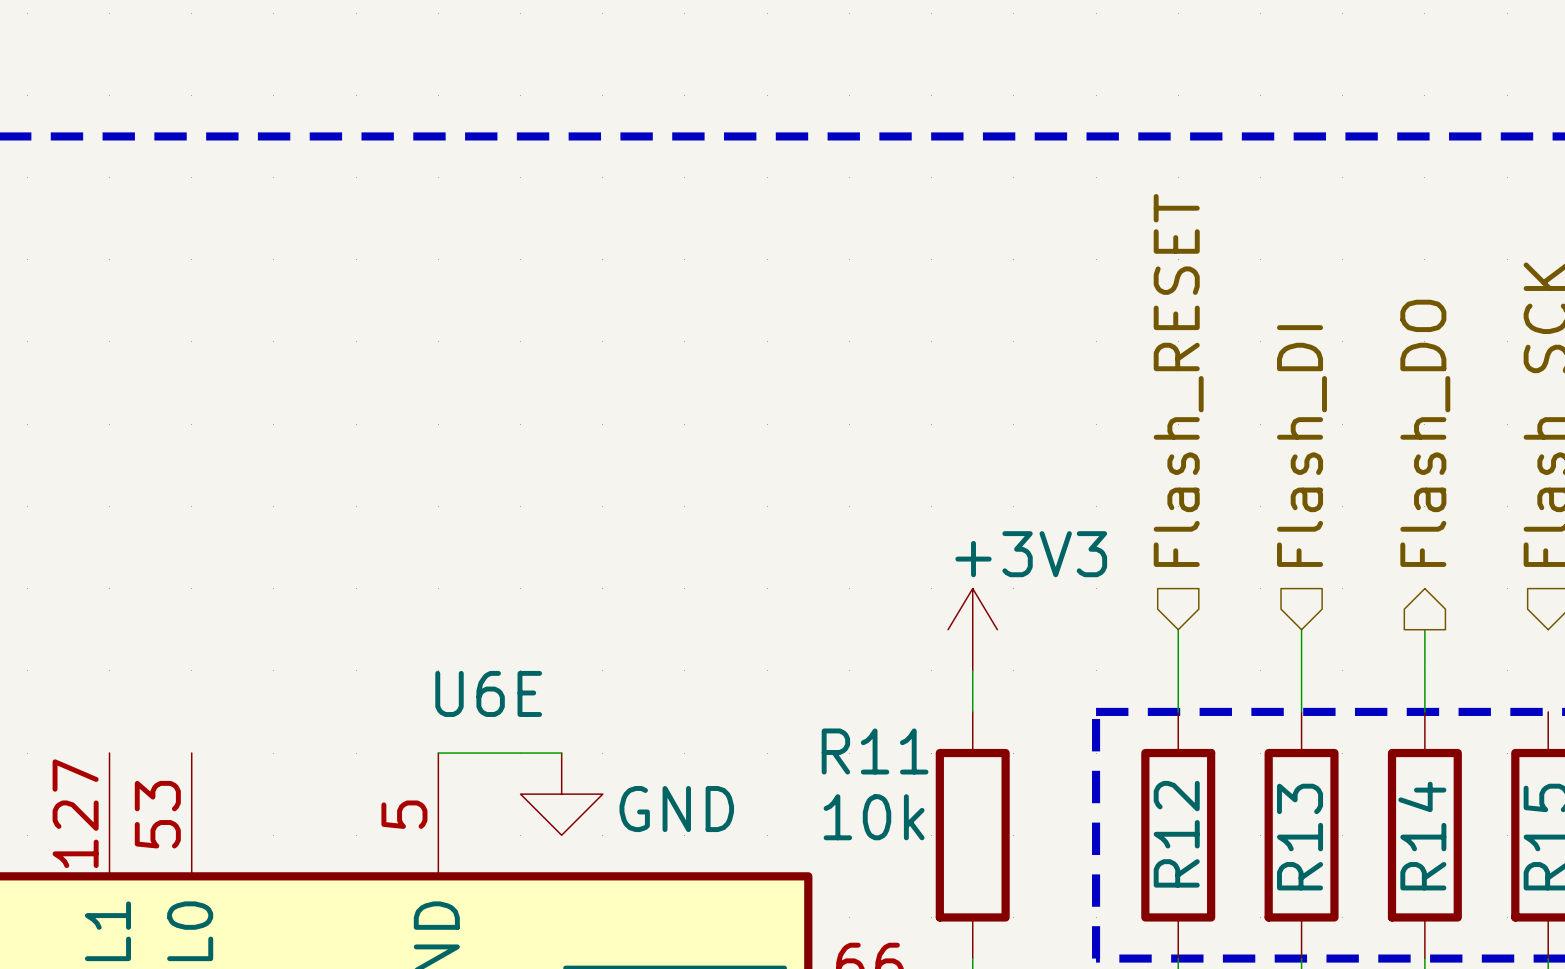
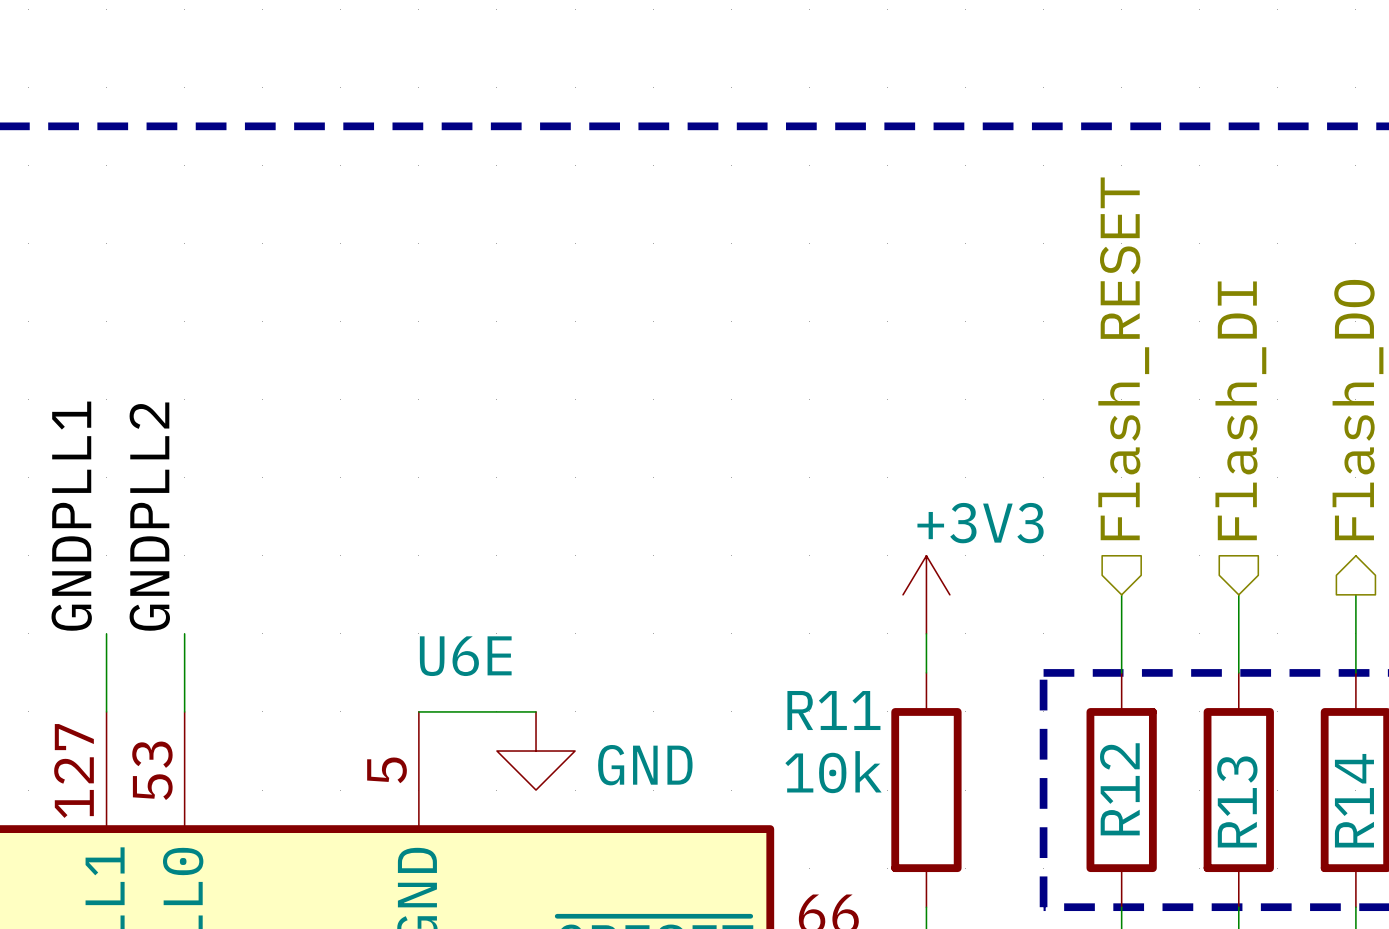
label: none -> GNDPLL1 (71, 516)
label: none -> GNDPLL2 (149, 516)
wire: none -> (106, 633) (106, 711)
wire: none -> (184, 633) (184, 711)

